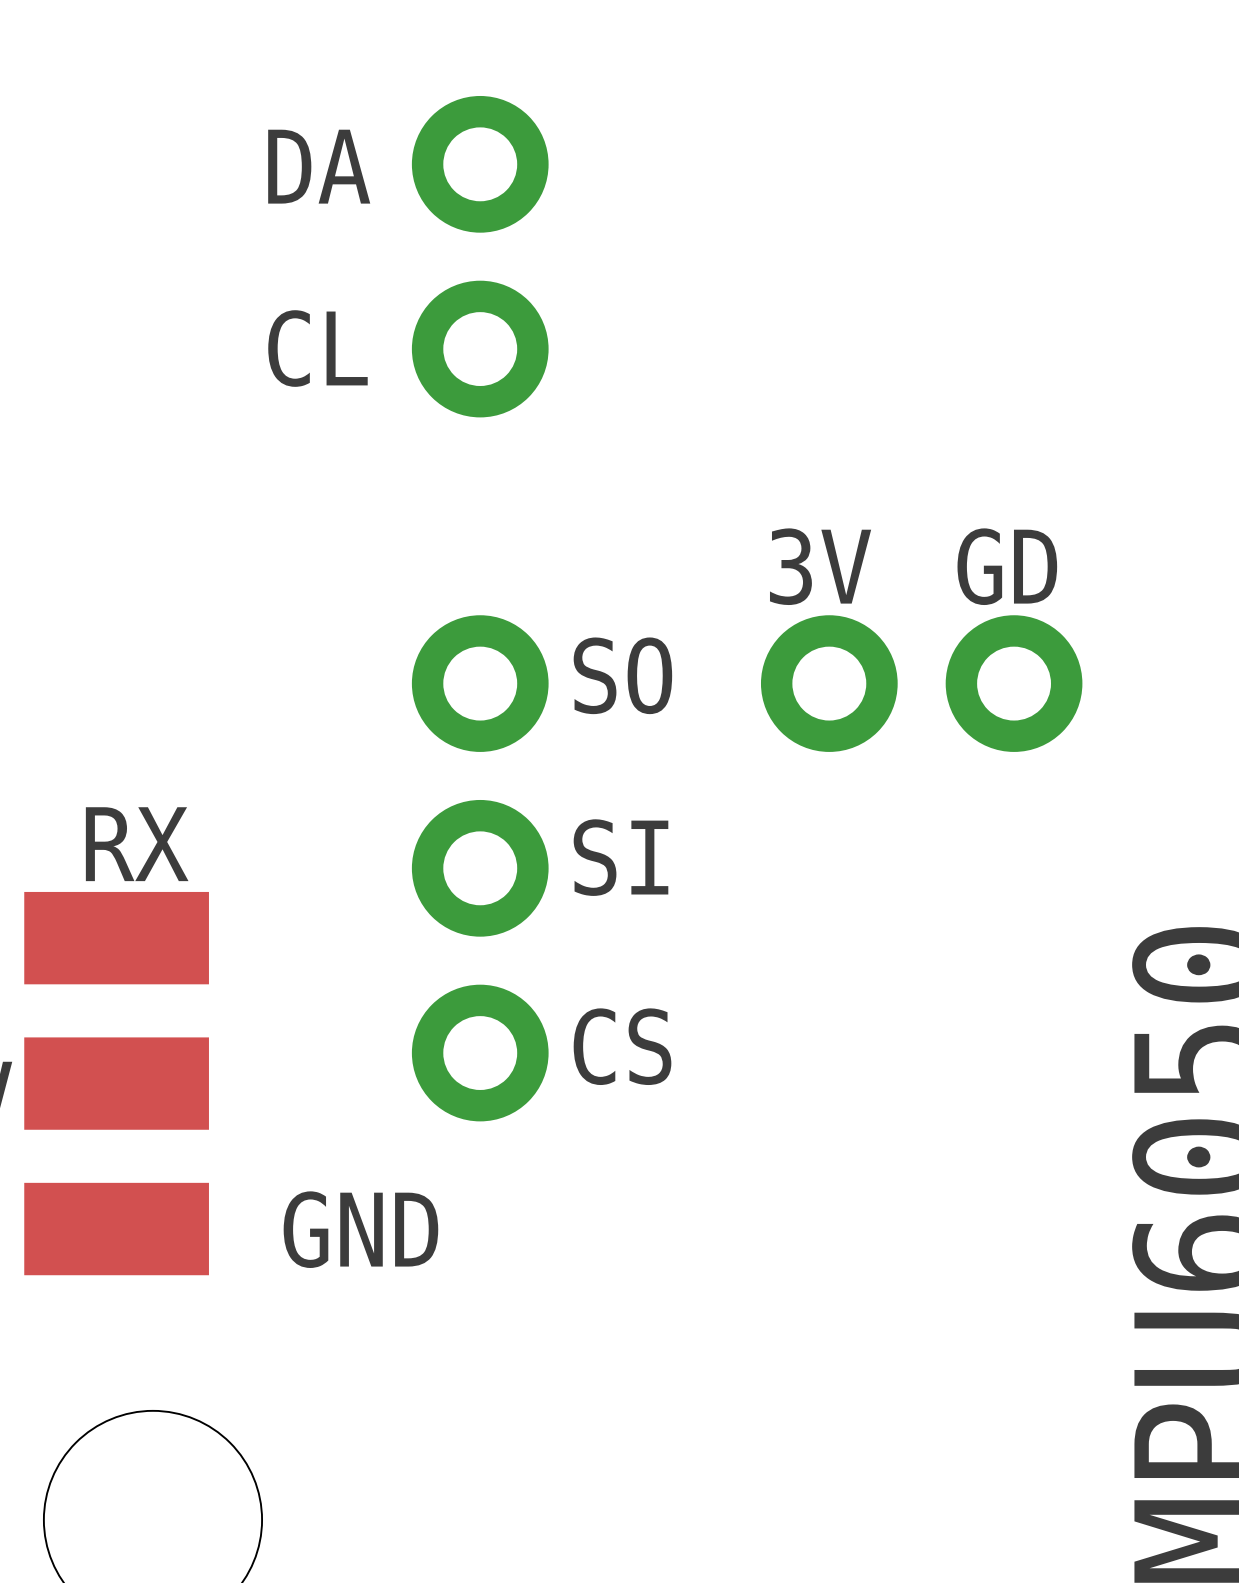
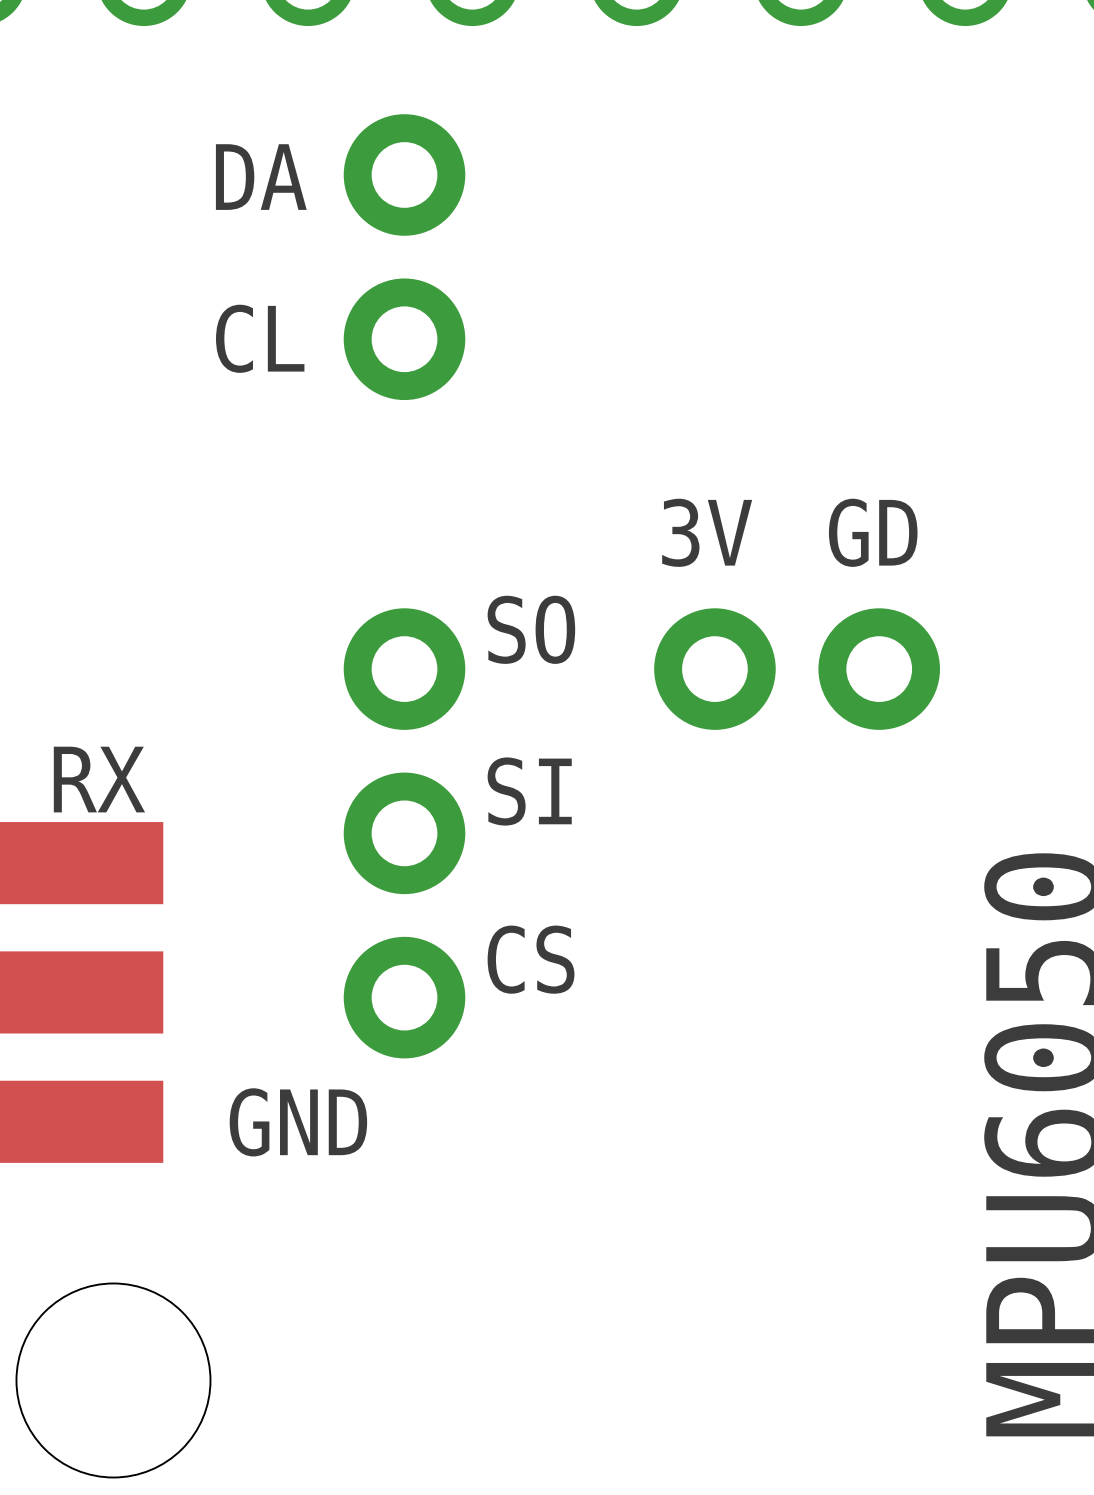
part position: (921, 683) -> (797, 669)
part position: (480, 868) -> (404, 833)

